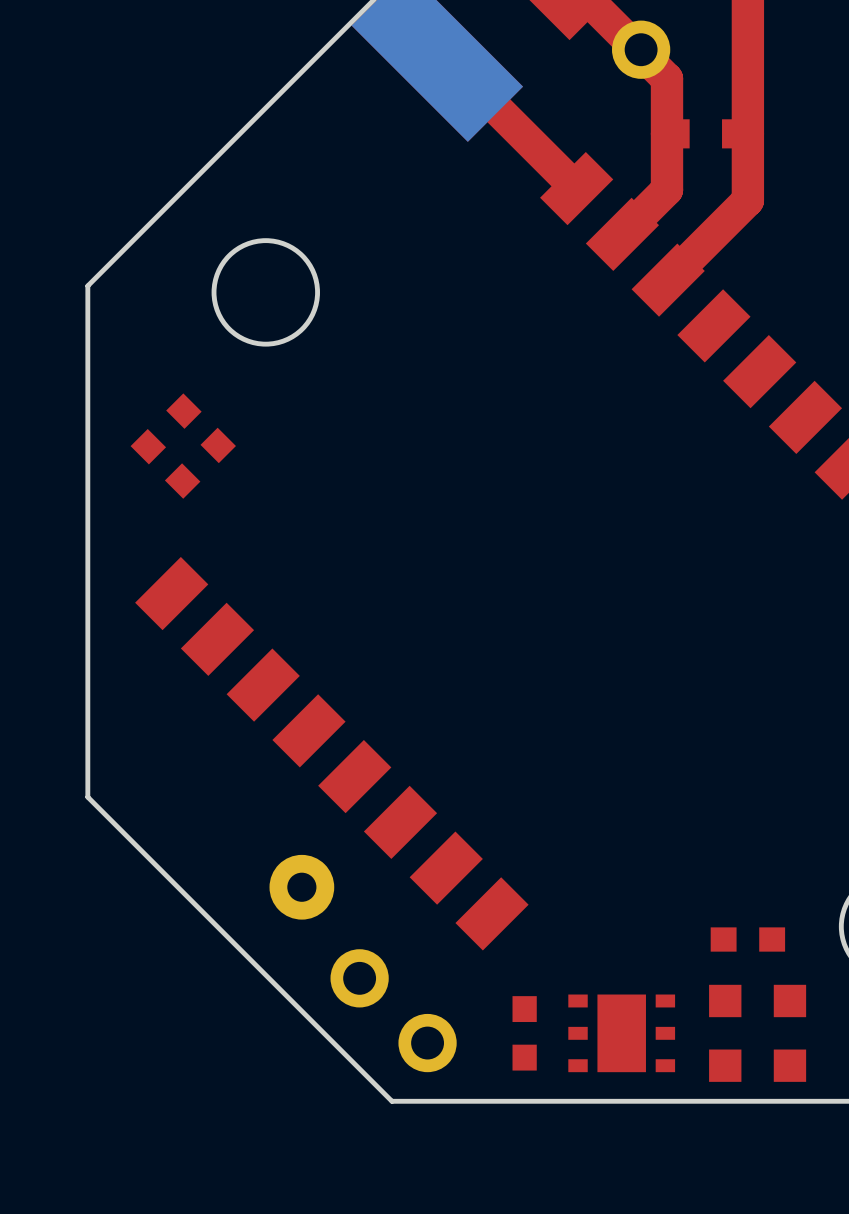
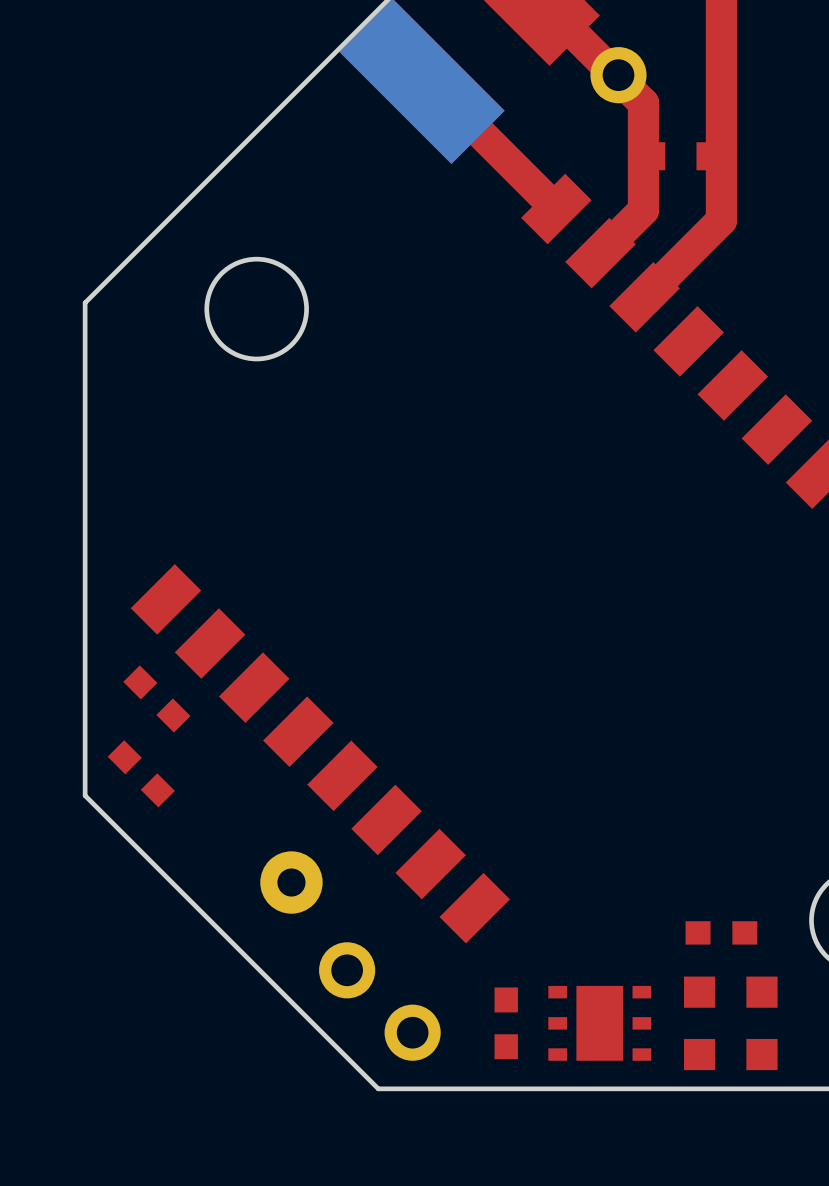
part: (201, 428) -> none
part: (165, 463) -> none
part: none -> (156, 698)
part: none -> (141, 773)

